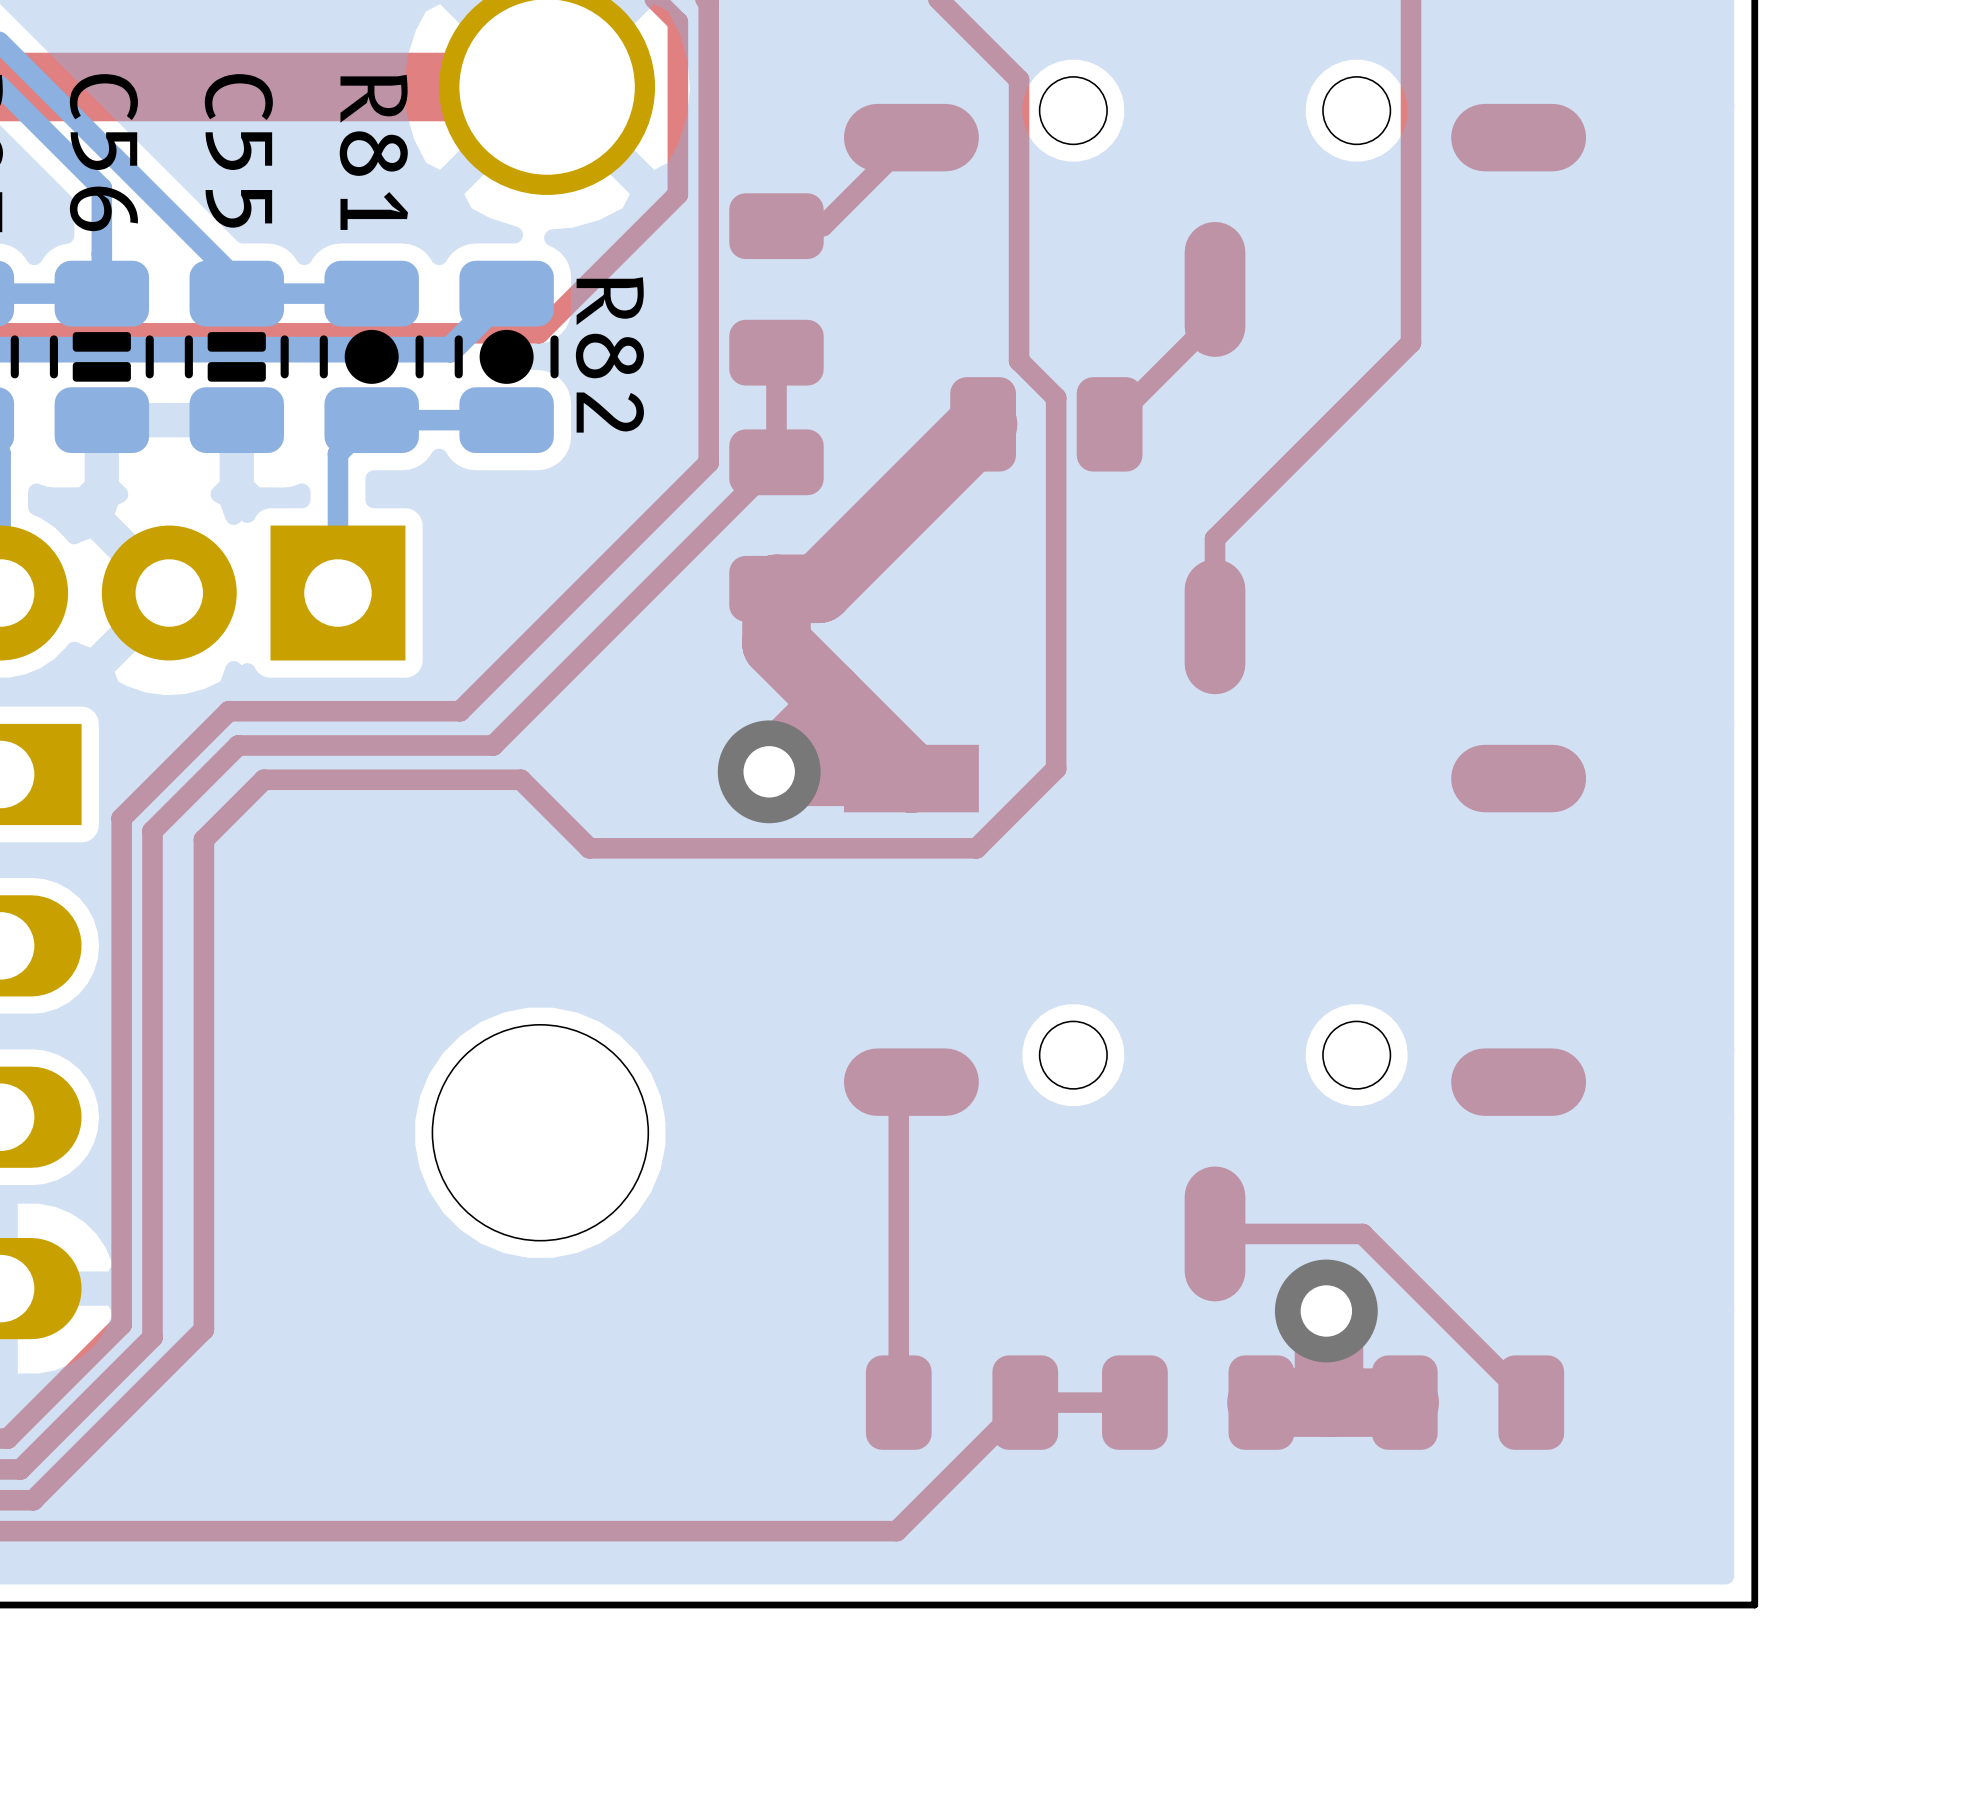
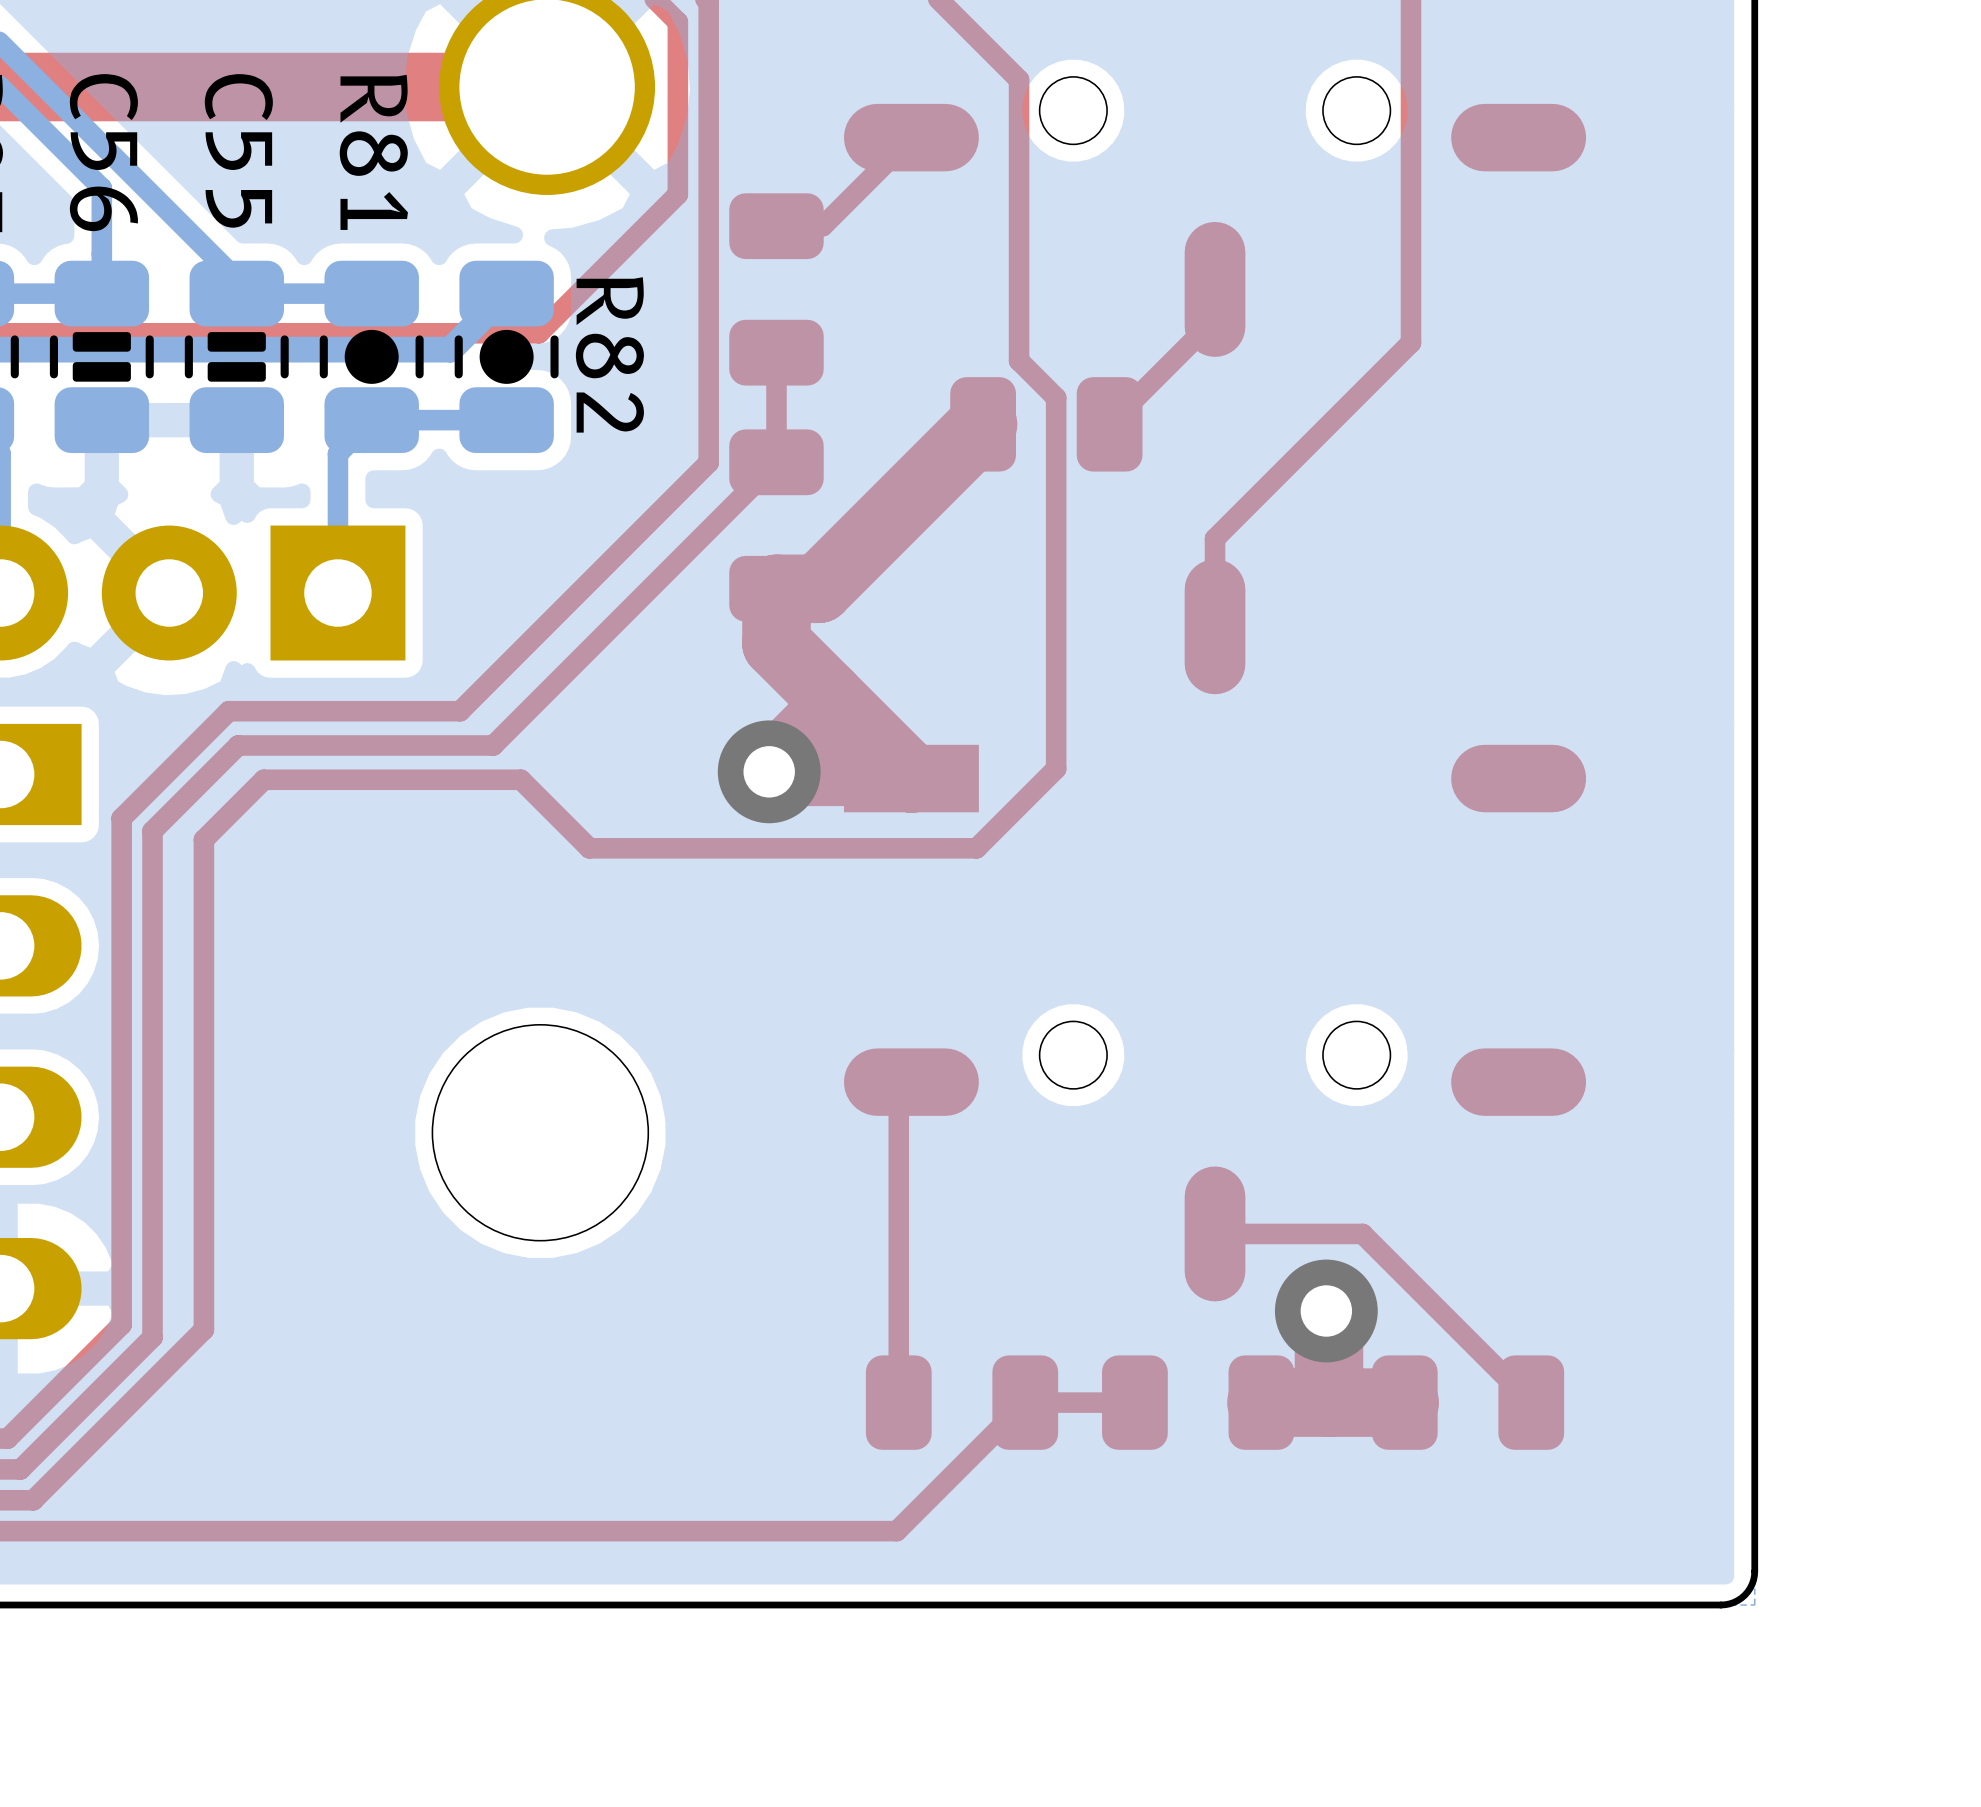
board edge: (1754, 1571) (1754, 1605) (1721, 1605) -> (1754, 1571) (1752, 1584) (1744, 1595) (1733, 1602) (1721, 1605)

